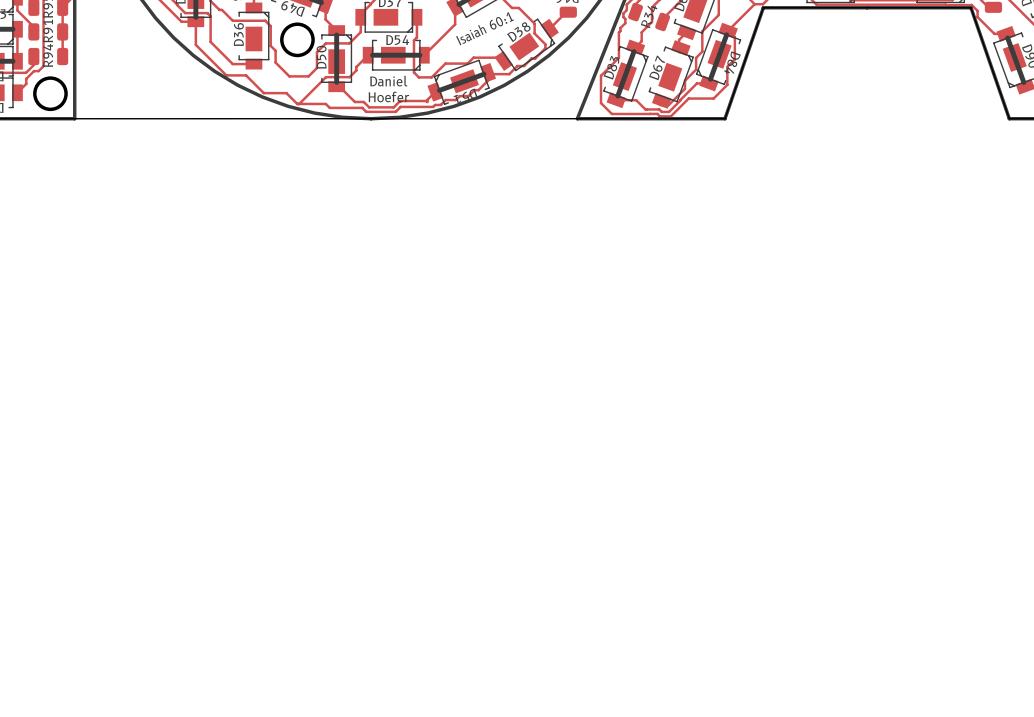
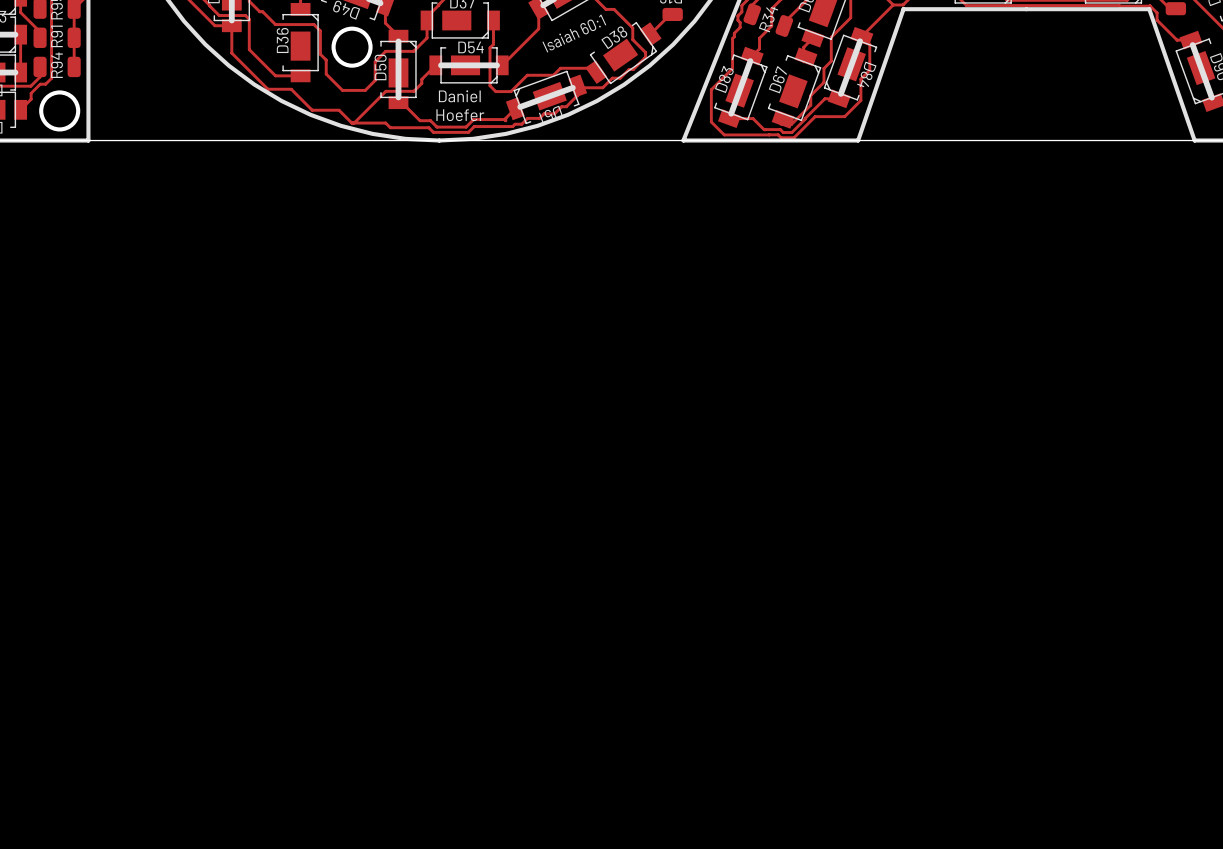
board edge: (725, 118) (763, 7) (970, 7) (1009, 118) -> (858, 140) (1194, 140)

